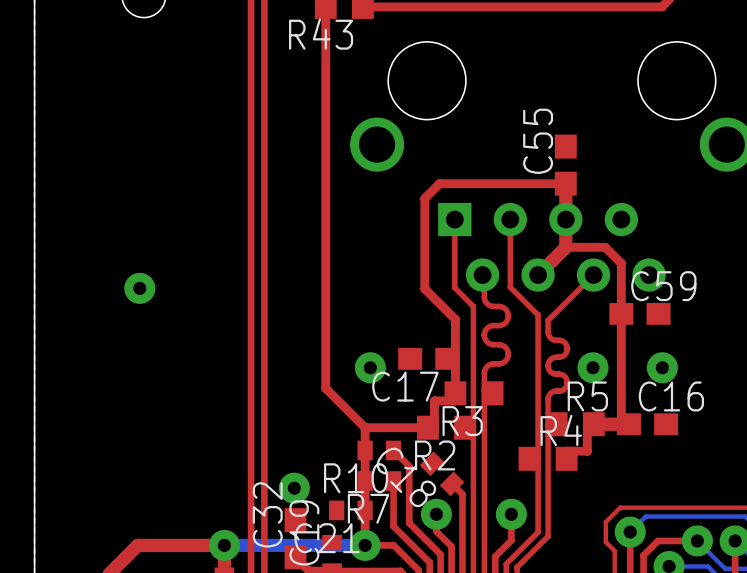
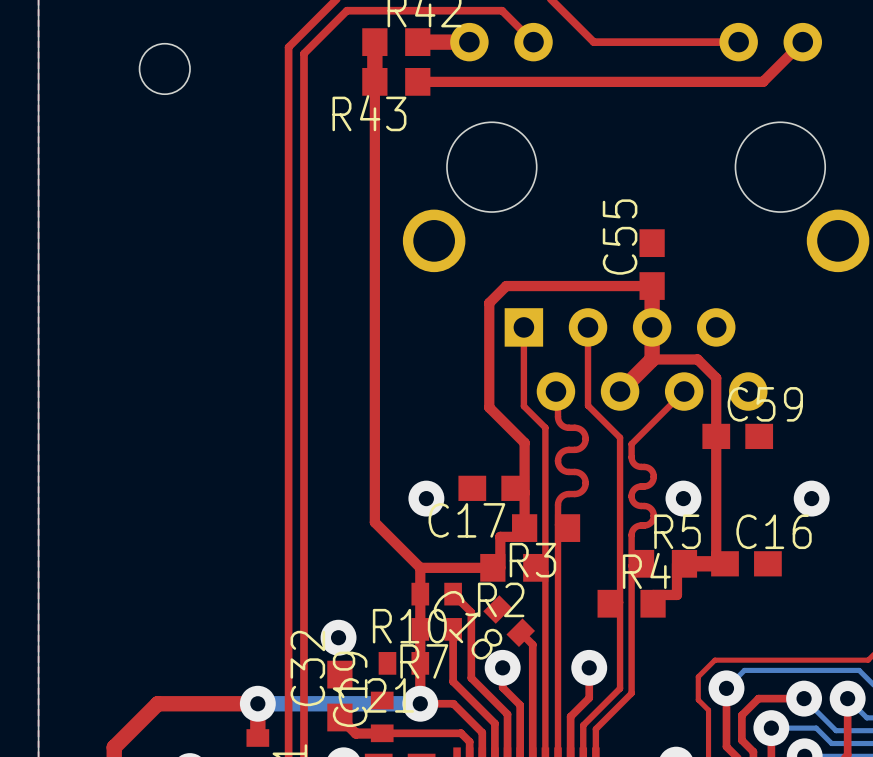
via: (139, 288) -> none
via position: (662, 367) -> (811, 498)

